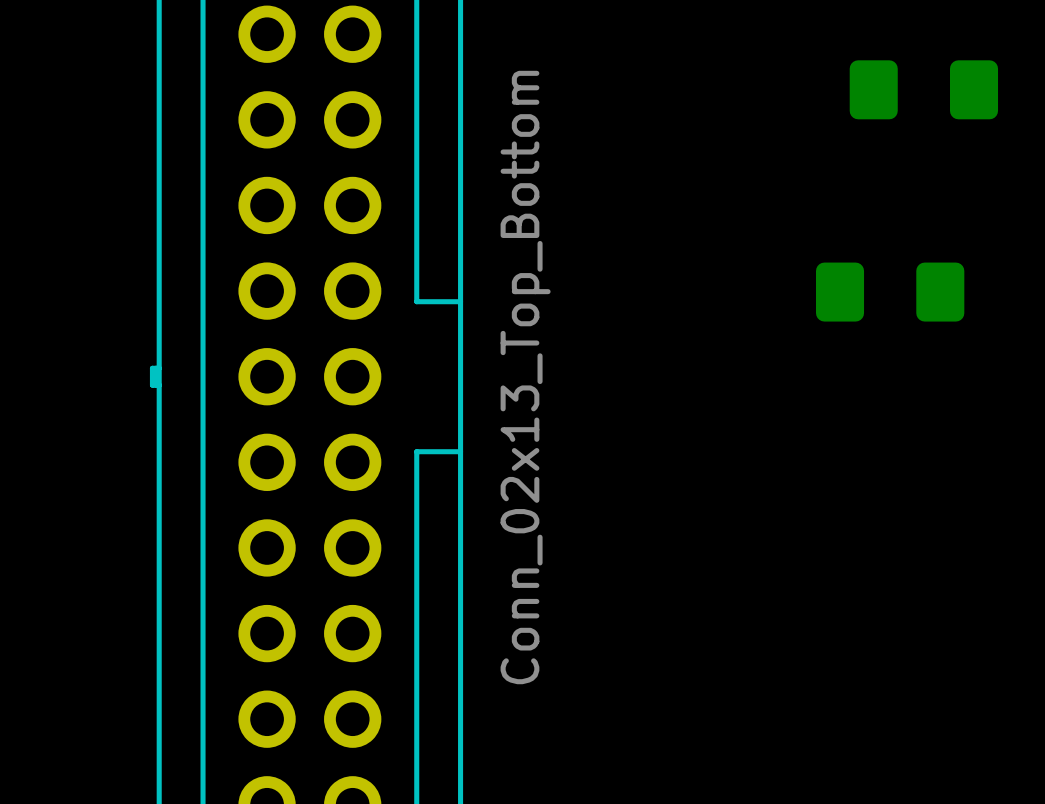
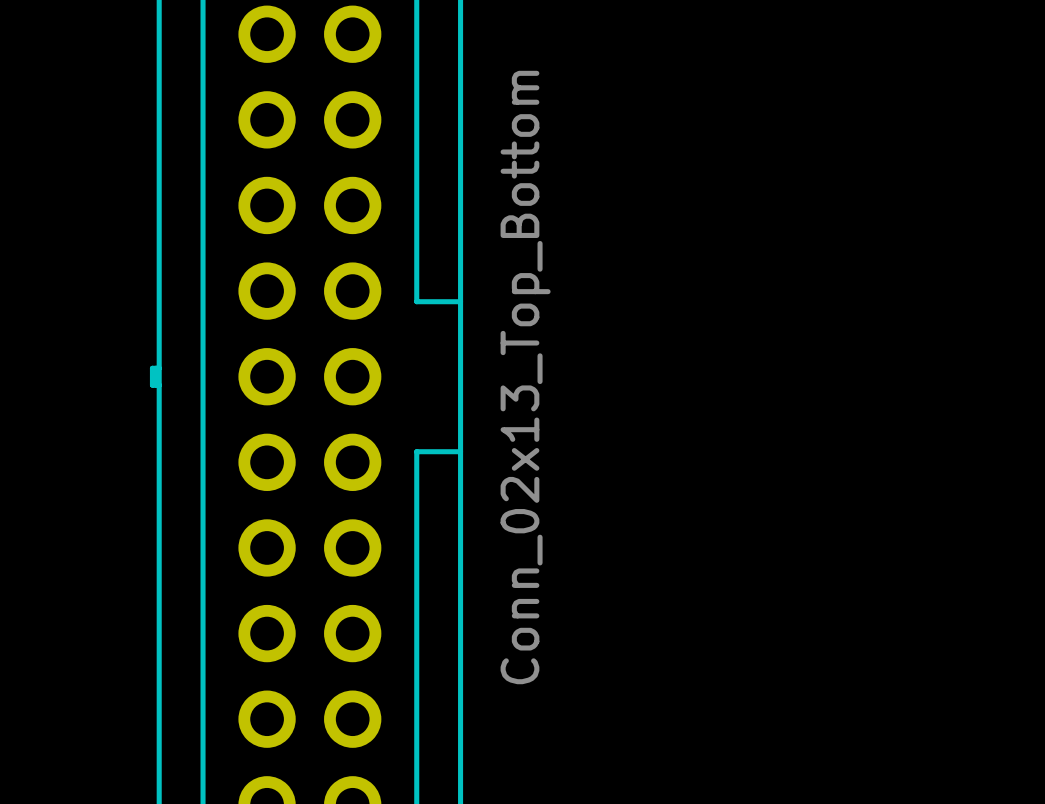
part: (923, 89) -> none
part: (890, 292) -> none

